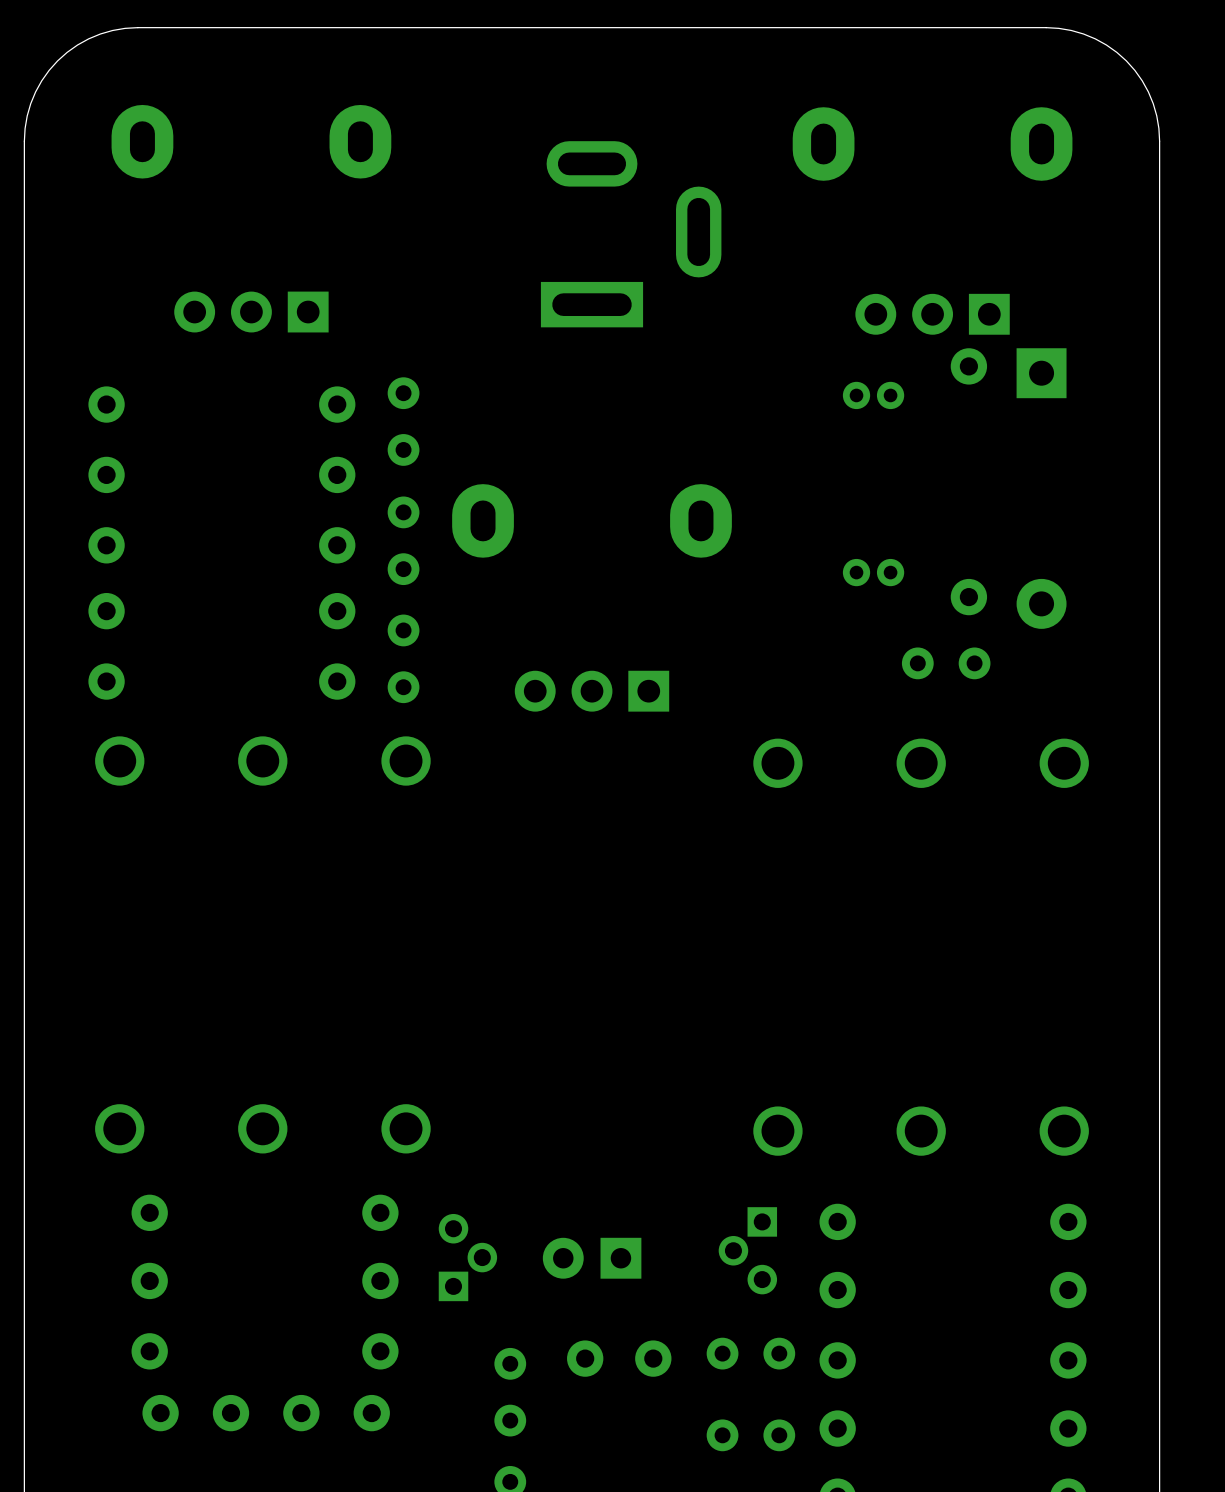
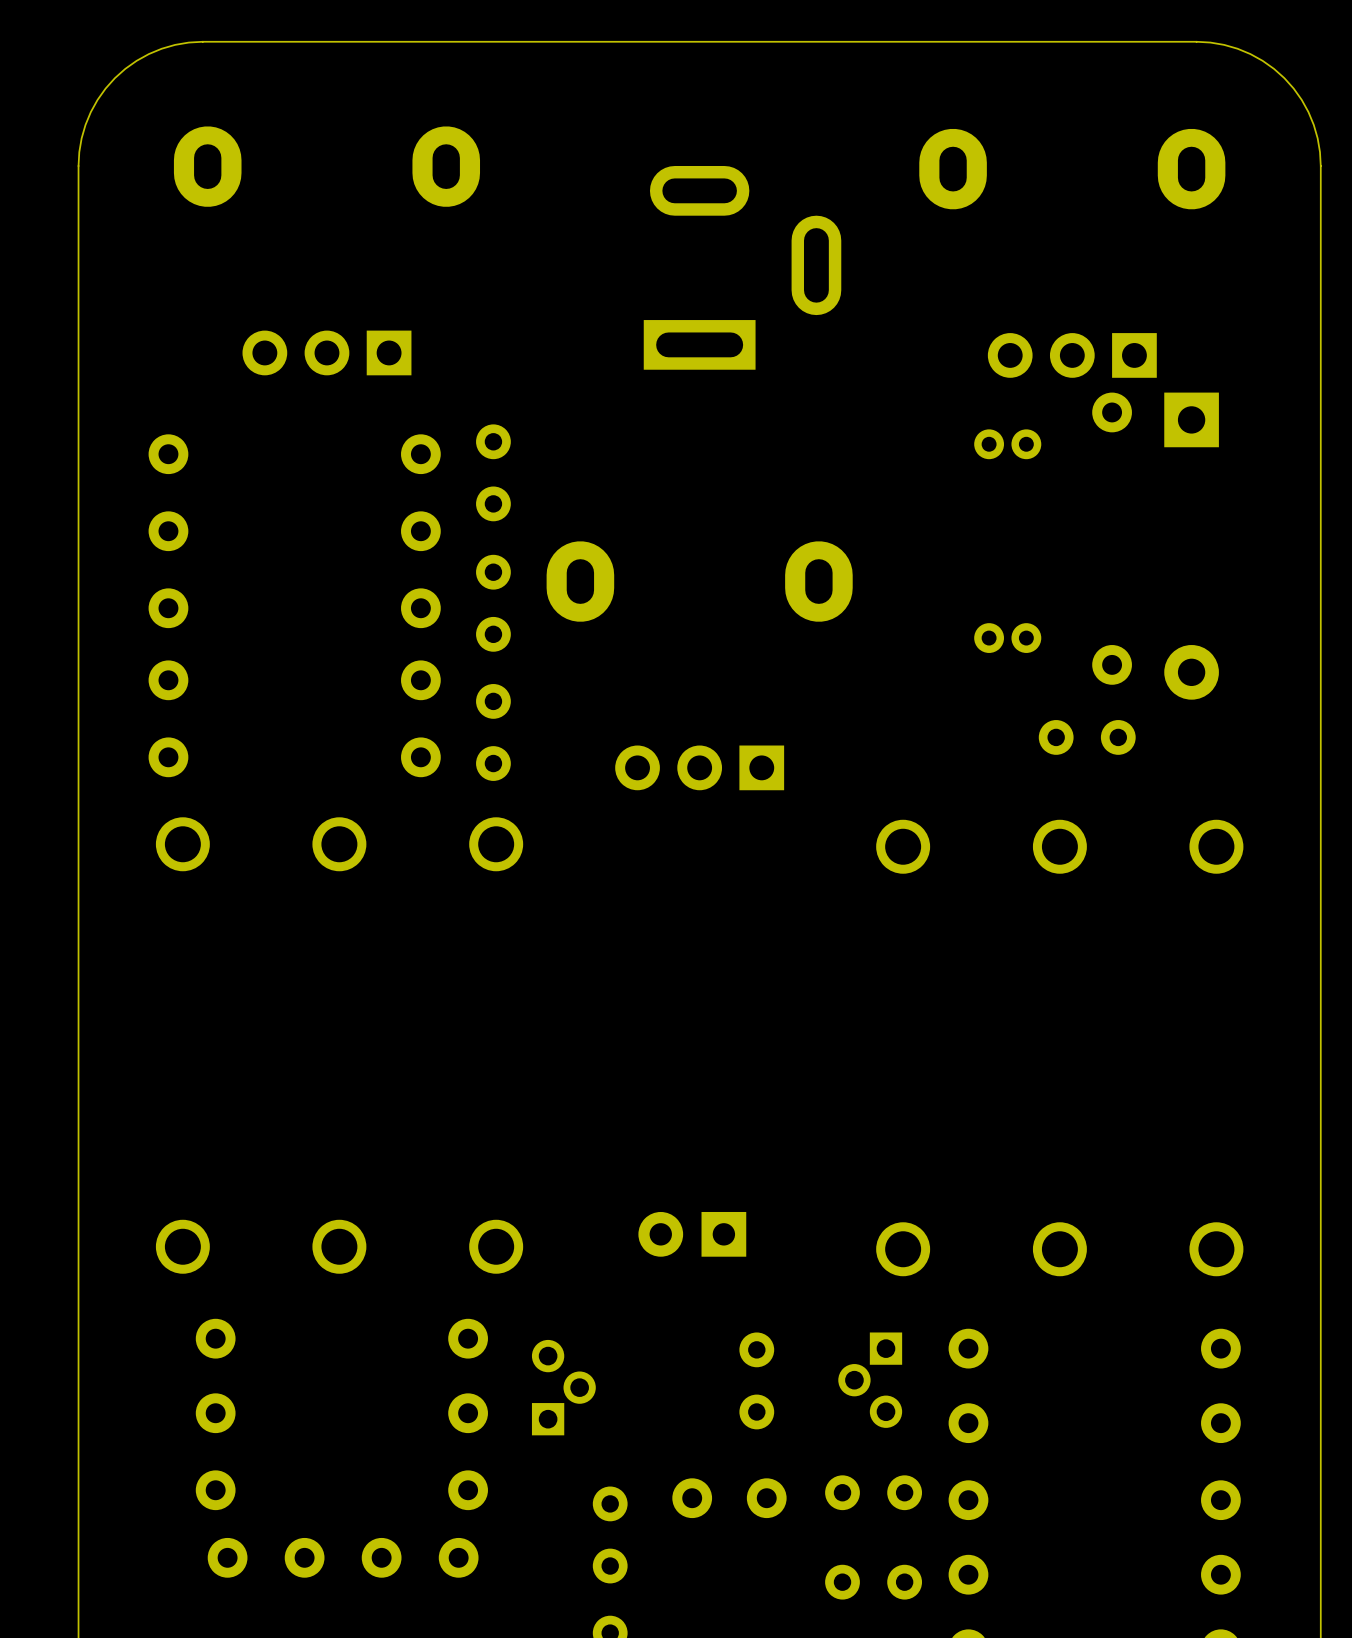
part: none -> (756, 1380)
part position: (592, 1258) -> (692, 1234)

